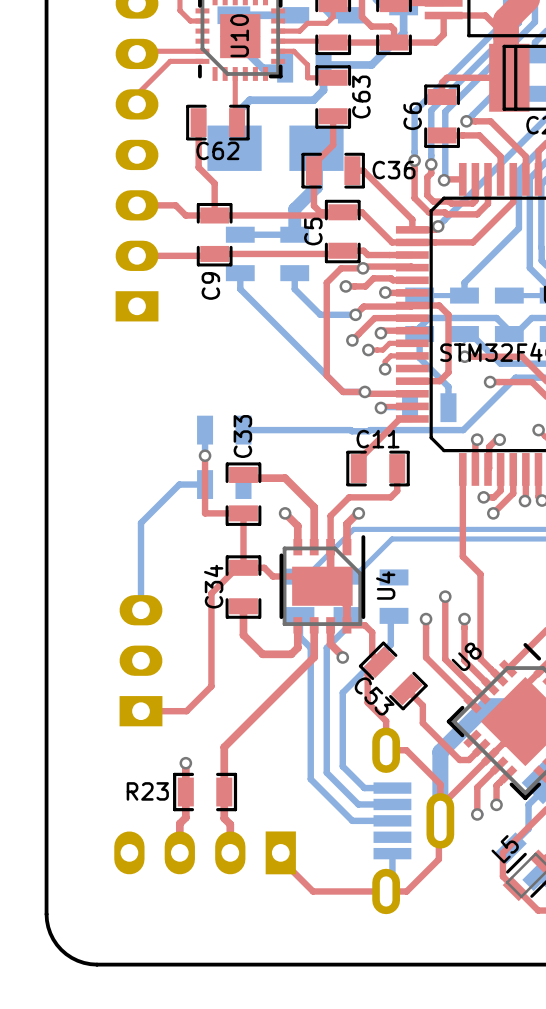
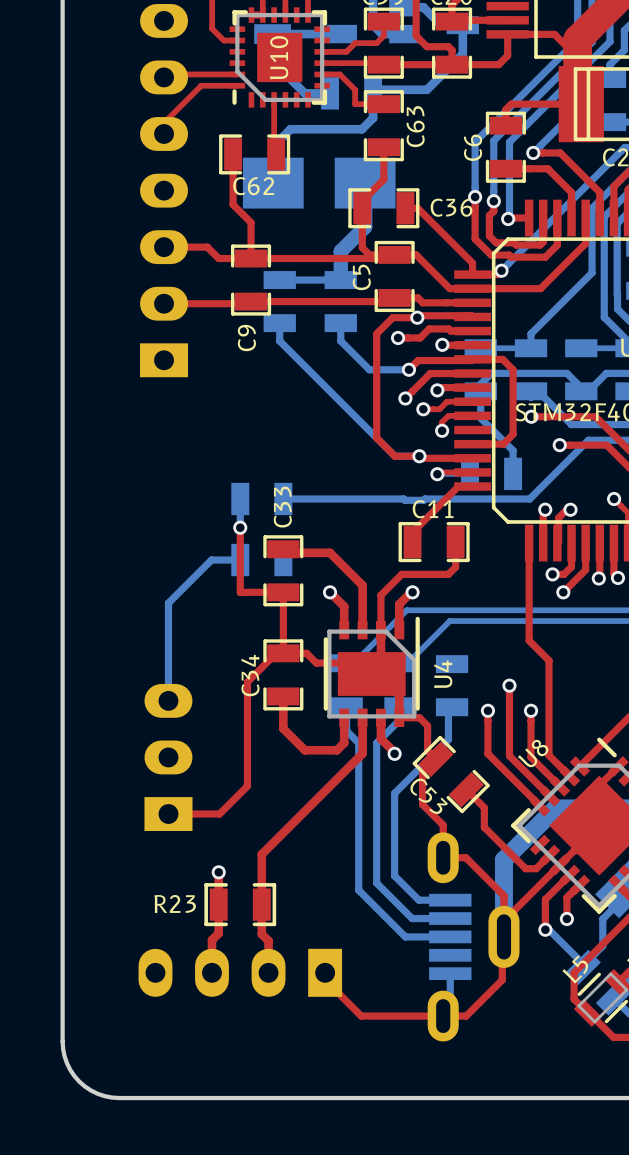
bottom track: none -> (548, 929) (583, 964)

